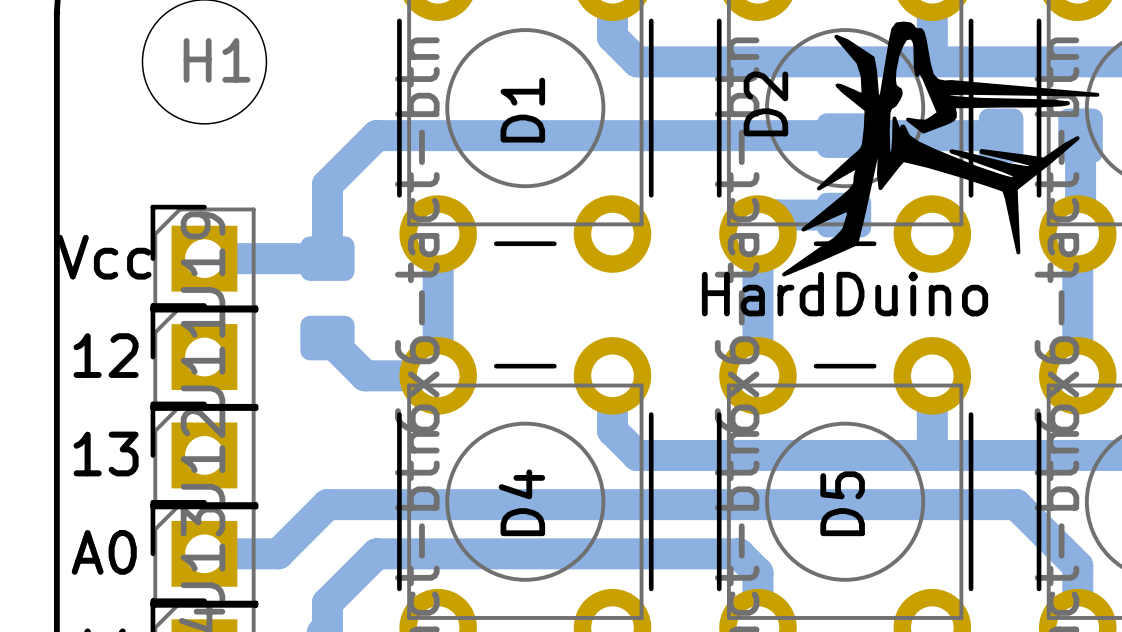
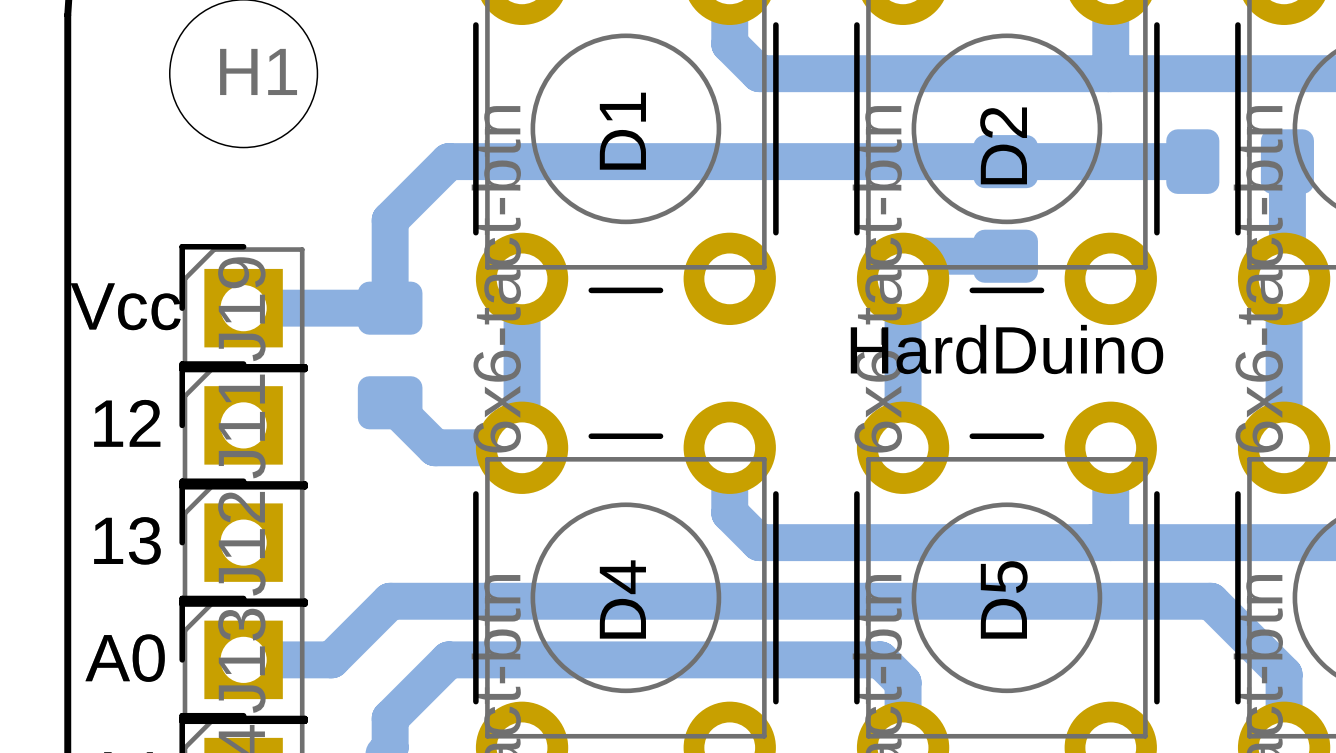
drawing: [782, 21, 1100, 277] -> none
D2 name position: D2 (765, 103) -> D2 (1003, 145)

